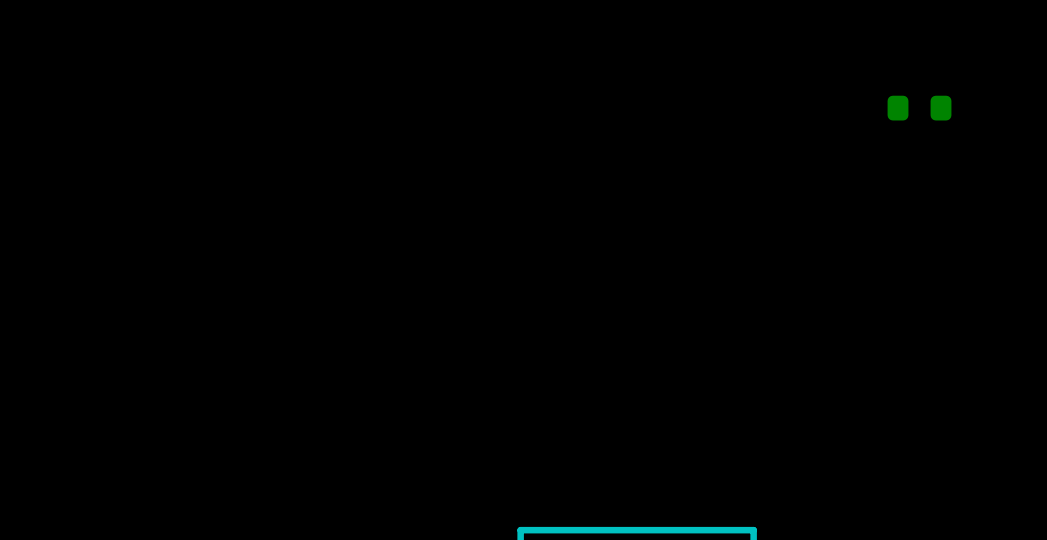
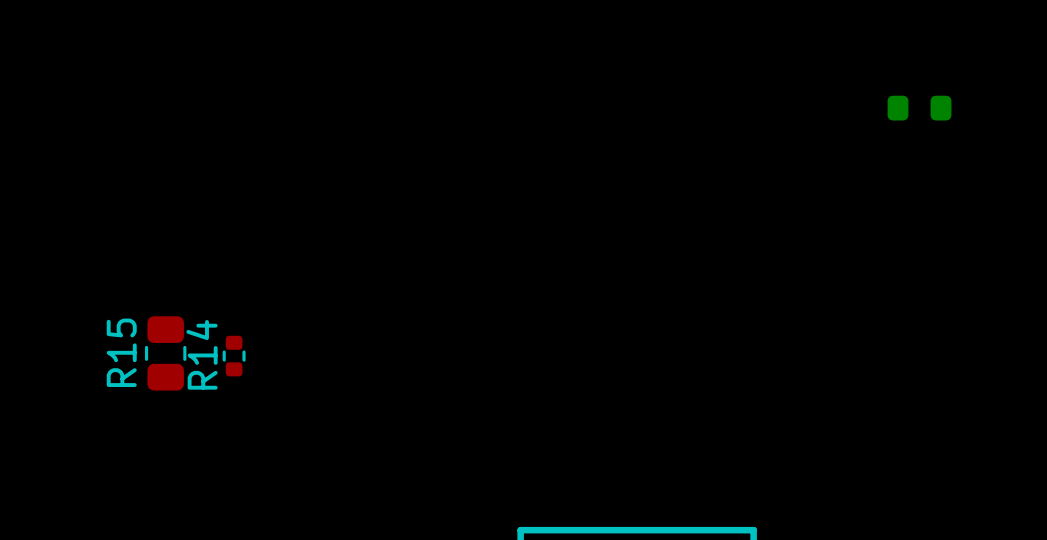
R15: none -> (165, 353)
R14: none -> (234, 356)

